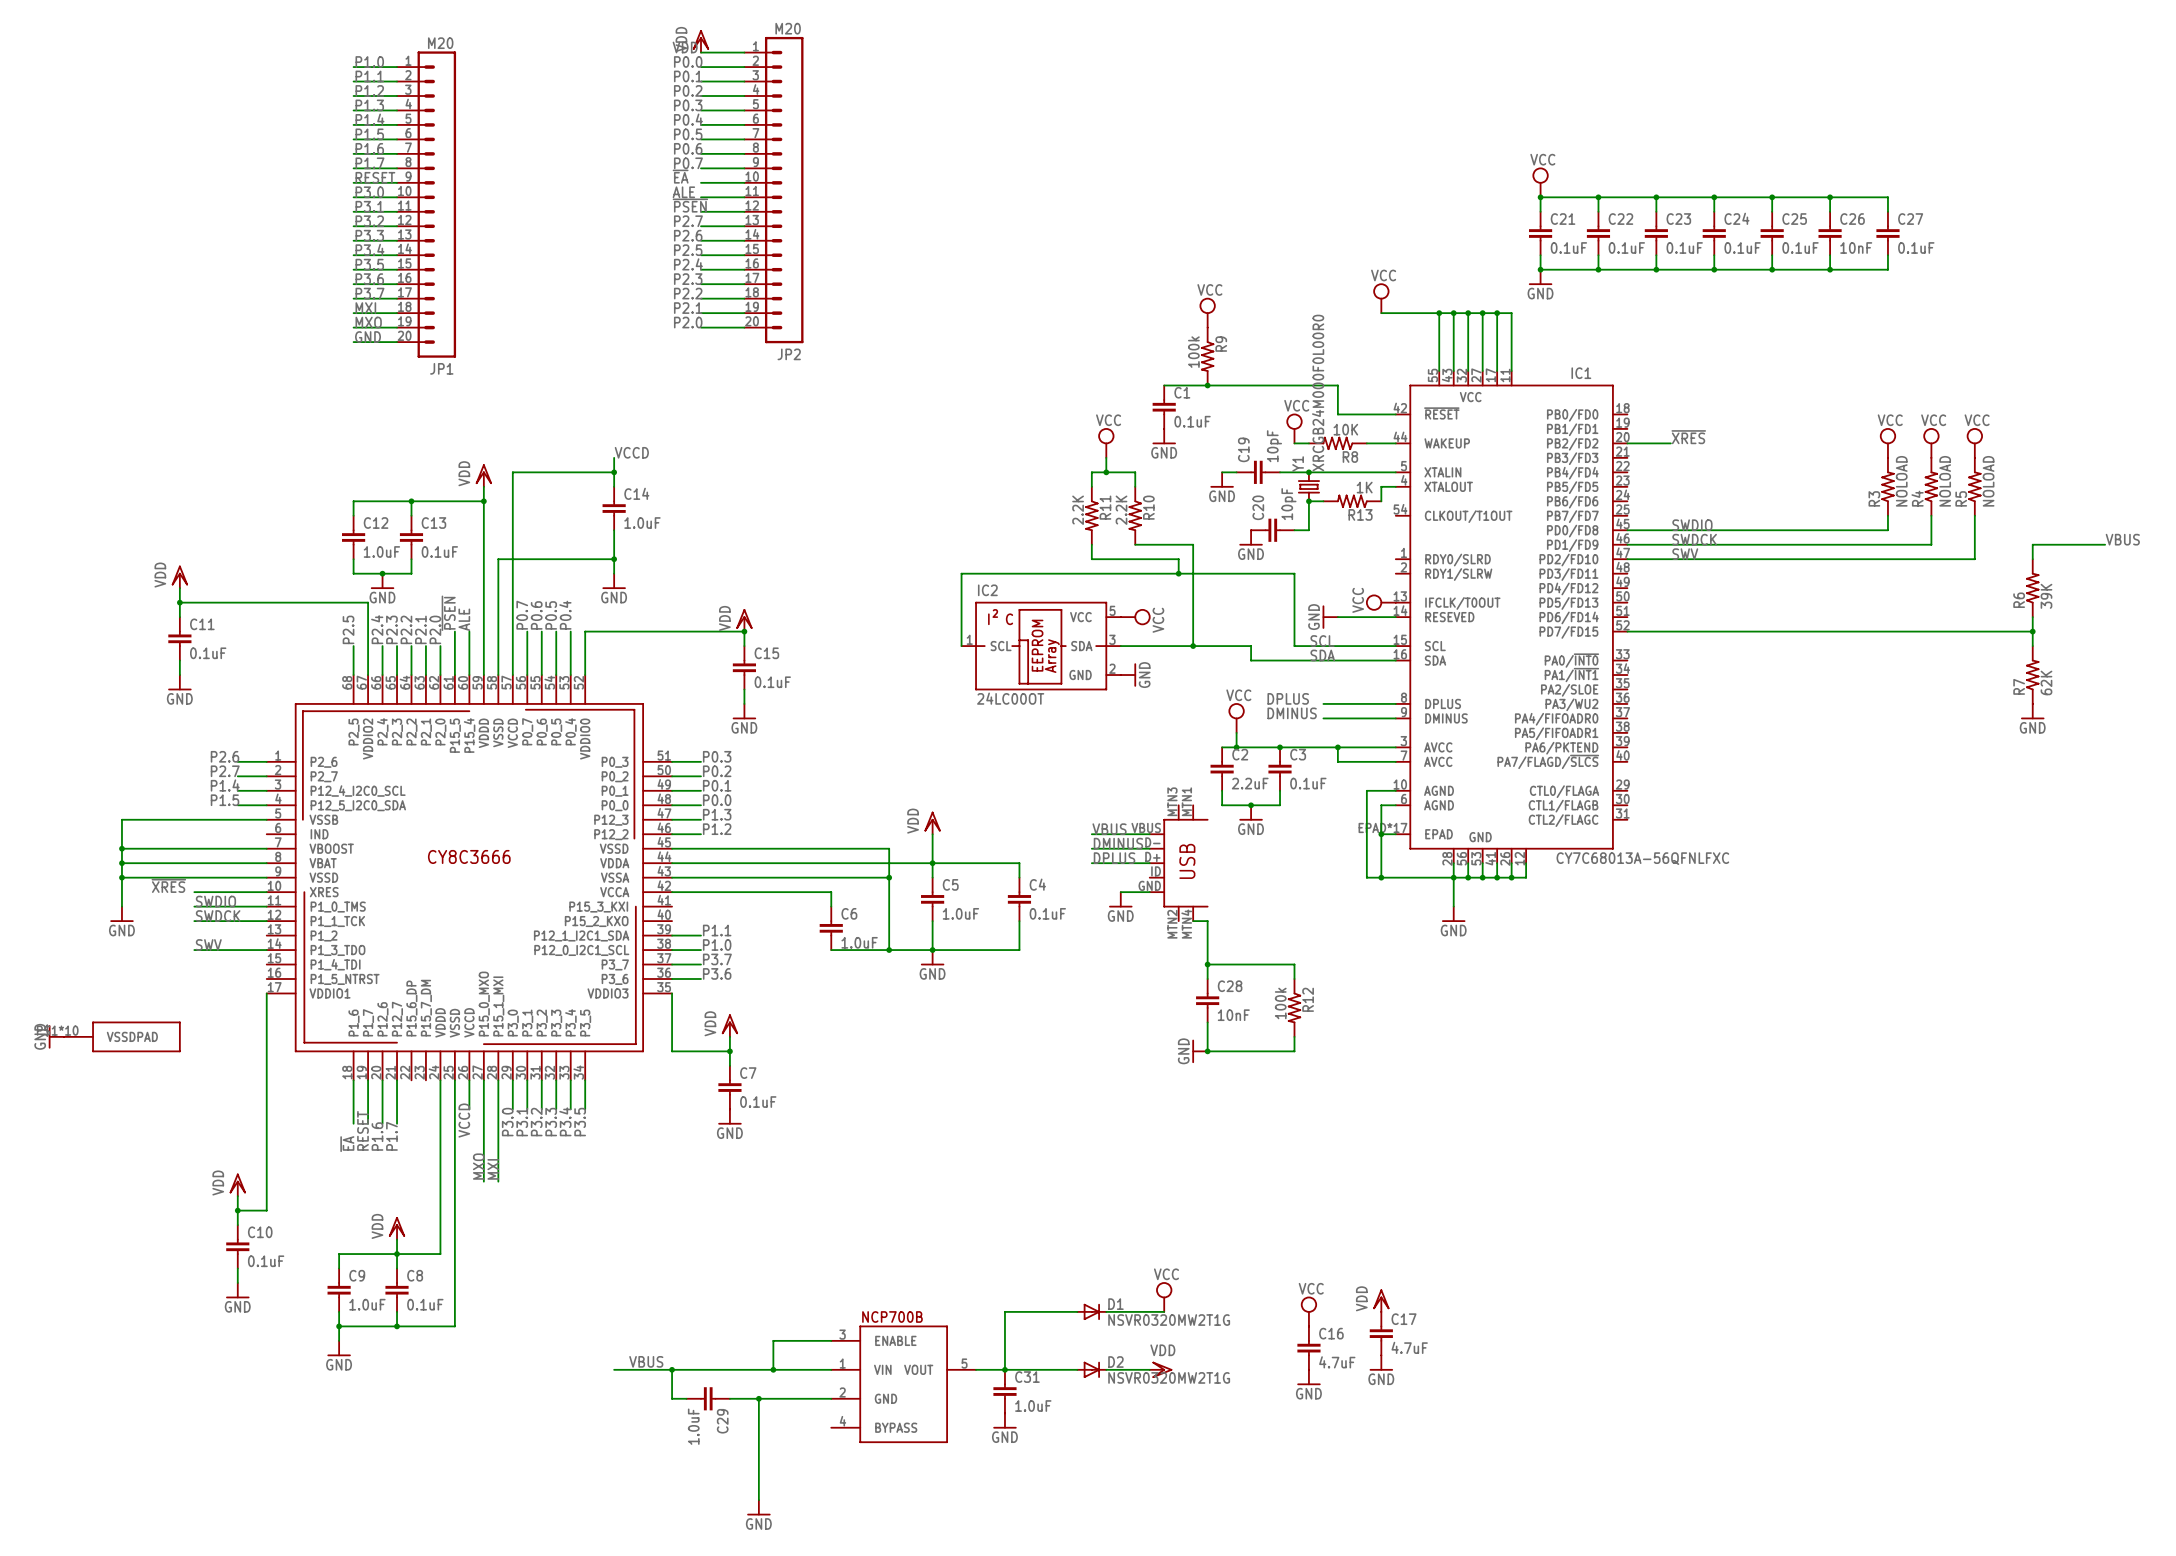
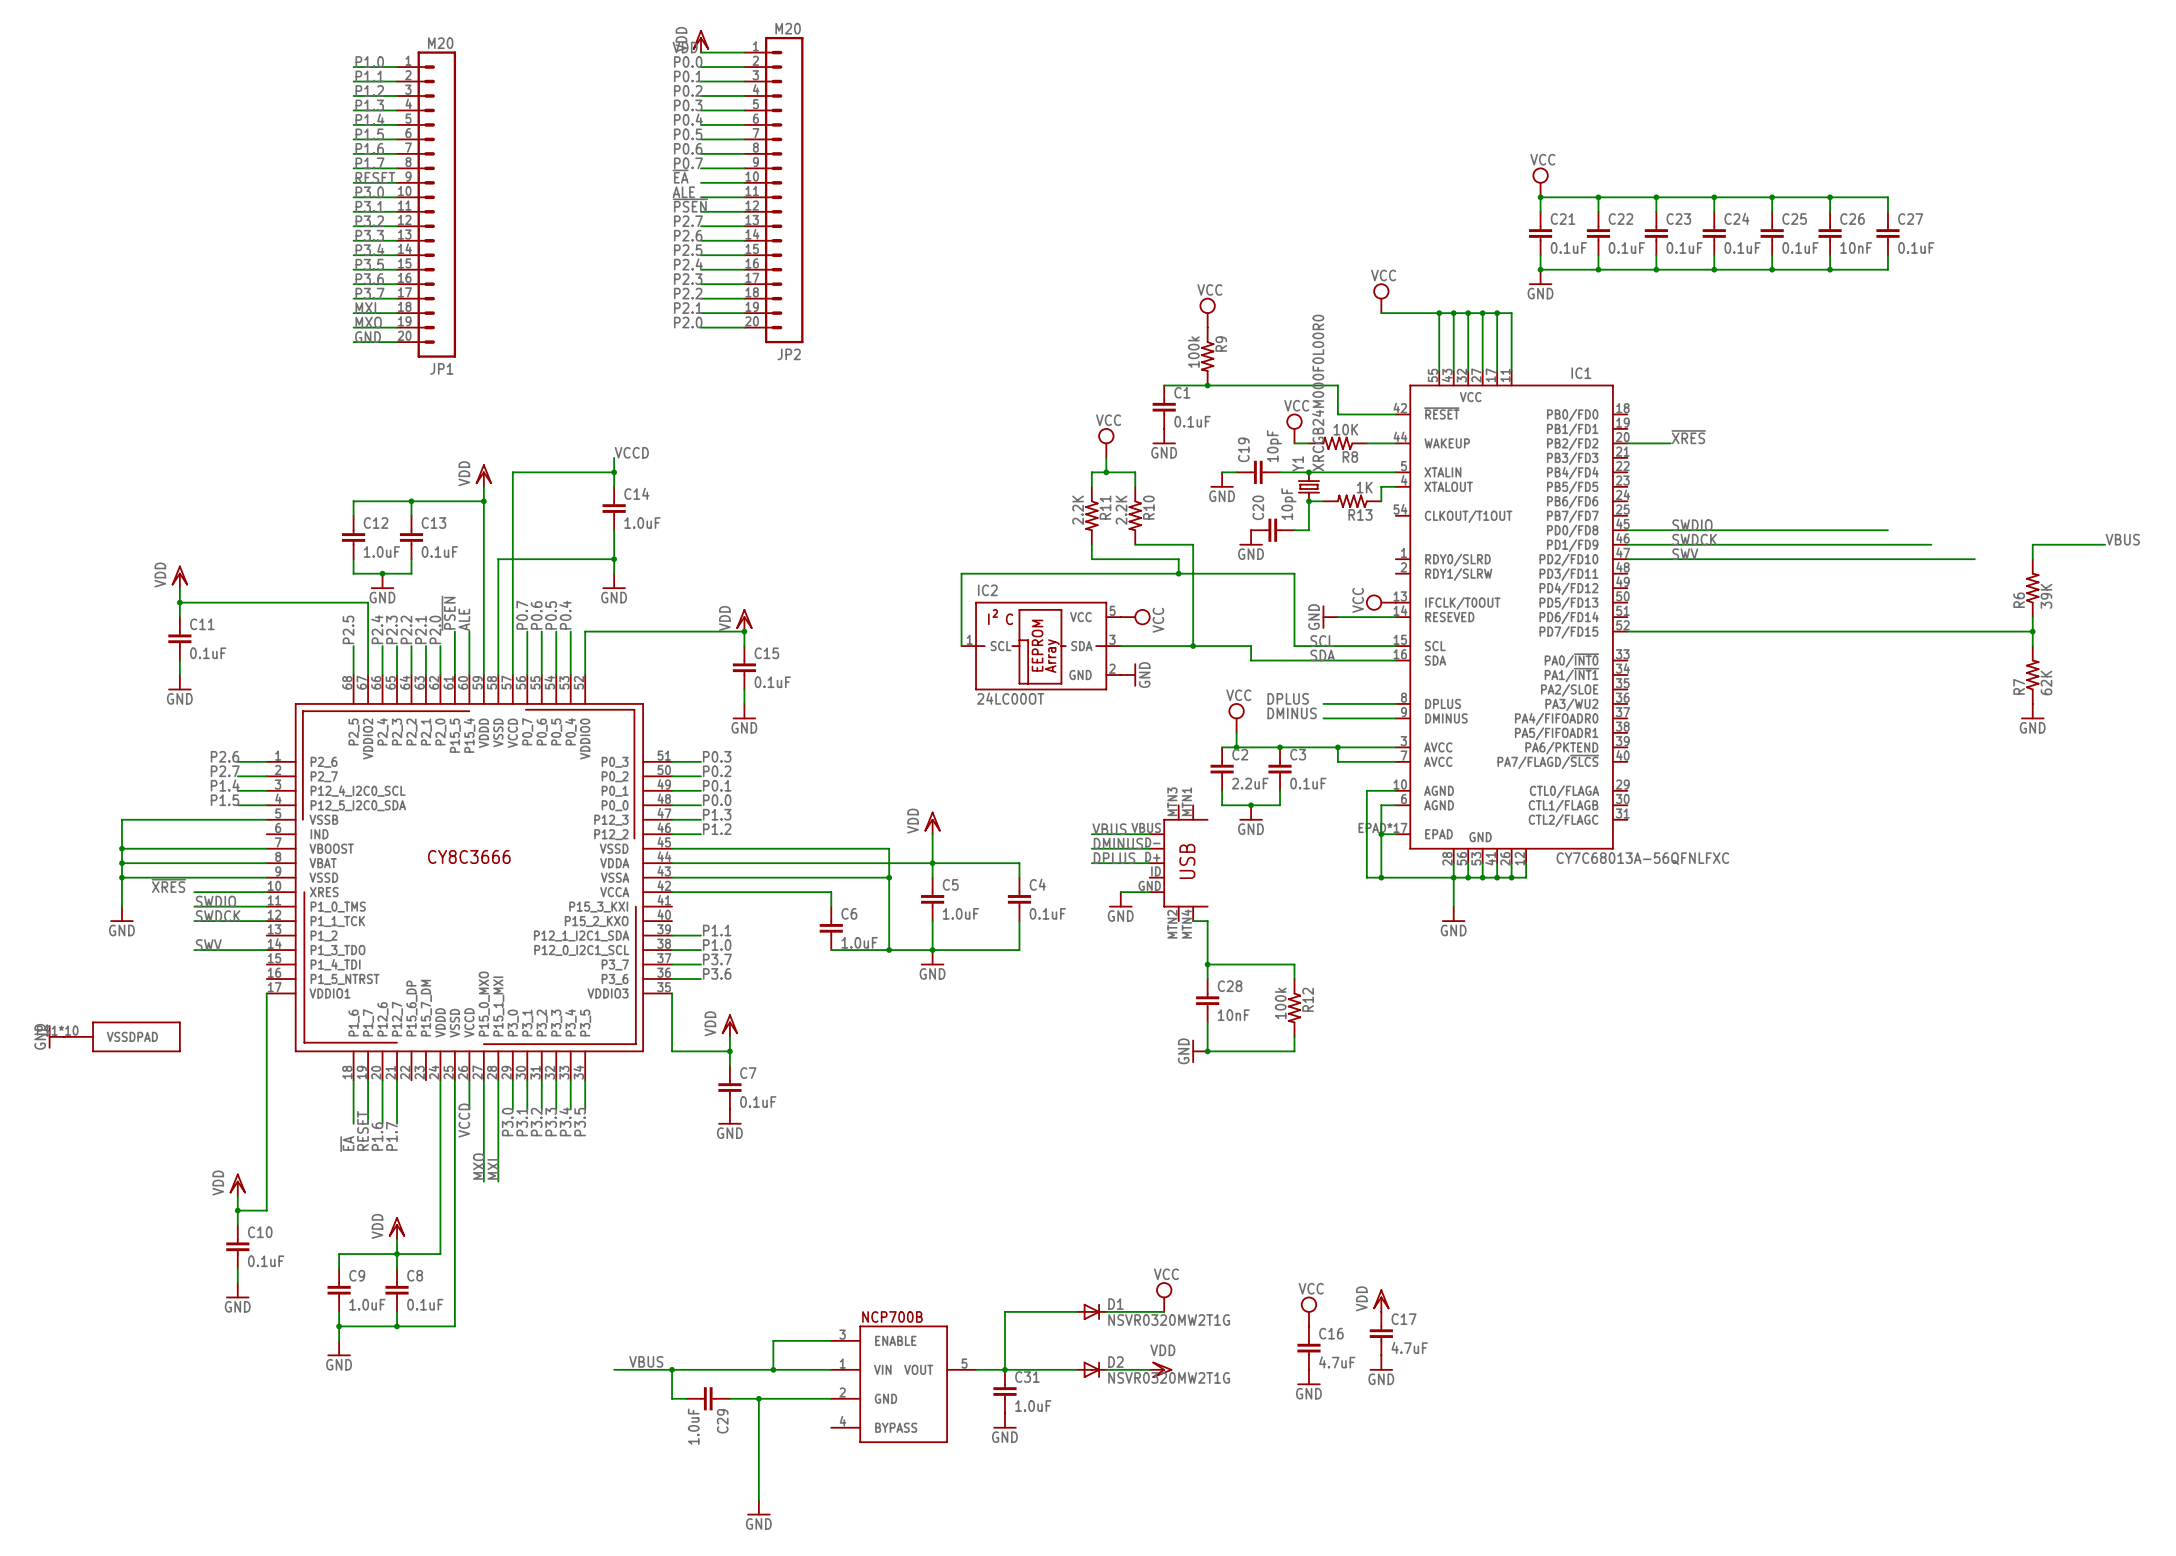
power symbol: VCC (1887, 443) -> none
power symbol: VCC (1931, 443) -> none
power symbol: VCC (1974, 443) -> none
R3: NOLOAD (1887, 486) -> none
R4: NOLOAD (1931, 486) -> none
R5: NOLOAD (1974, 486) -> none
wire: (1887, 515) (1887, 530) -> none
wire: (1931, 515) (1931, 544) -> none
wire: (1974, 515) (1974, 559) -> none

